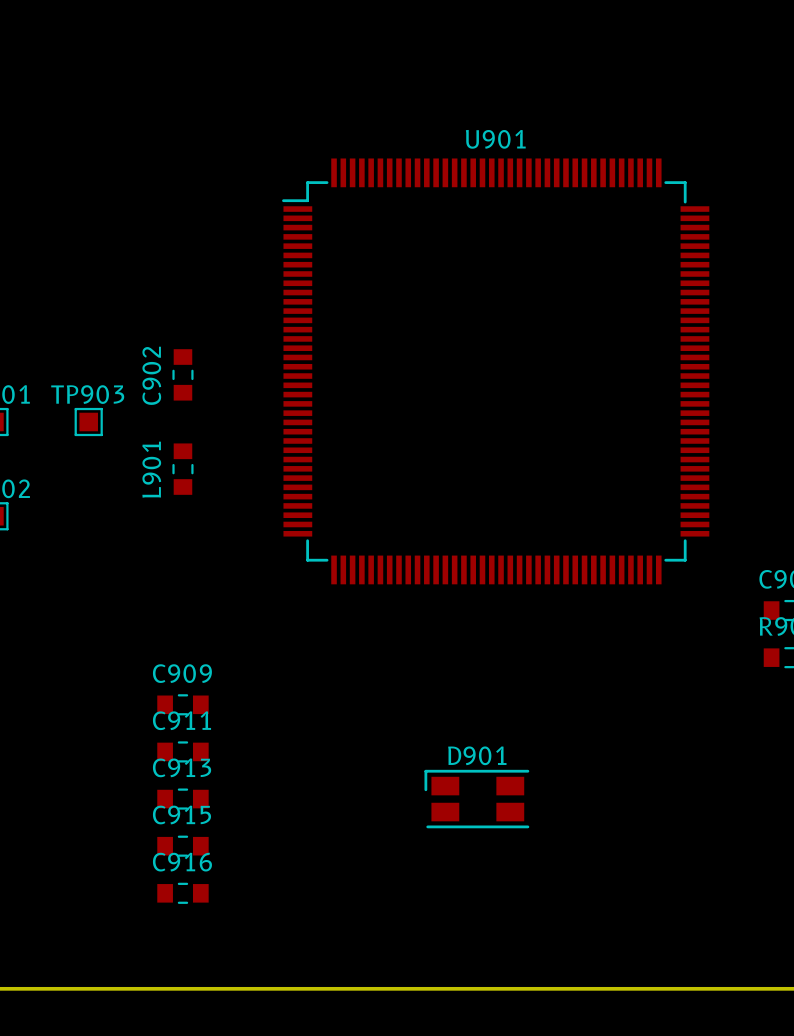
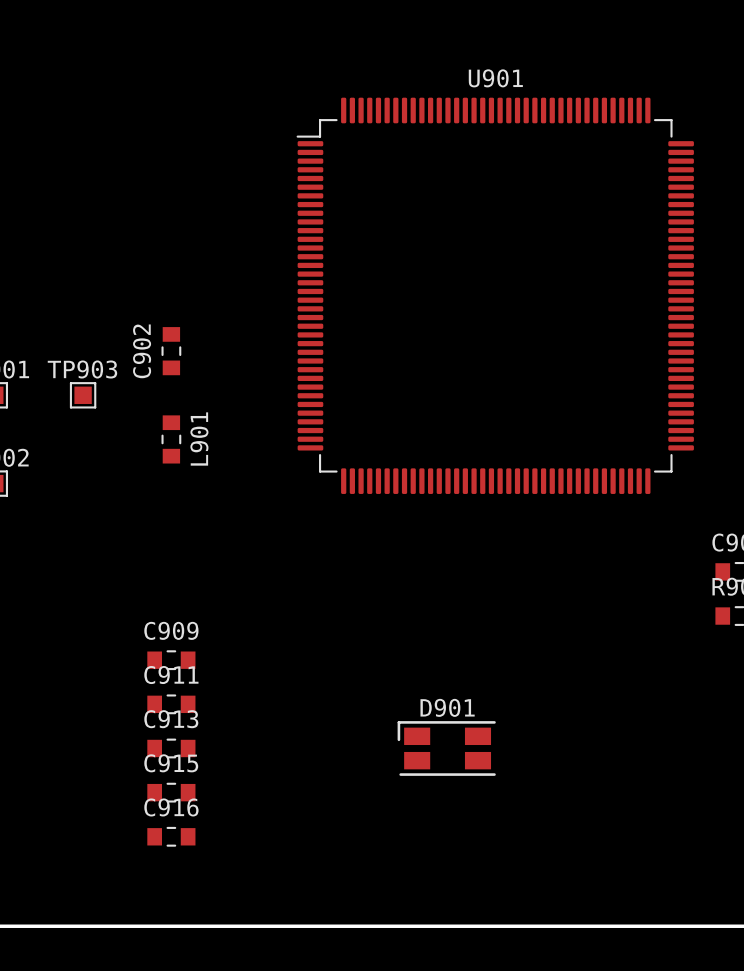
U901 footprint: [282, 158, 710, 585] -> [296, 97, 694, 494]
L901 name position: L901 (151, 469) -> L901 (199, 439)

